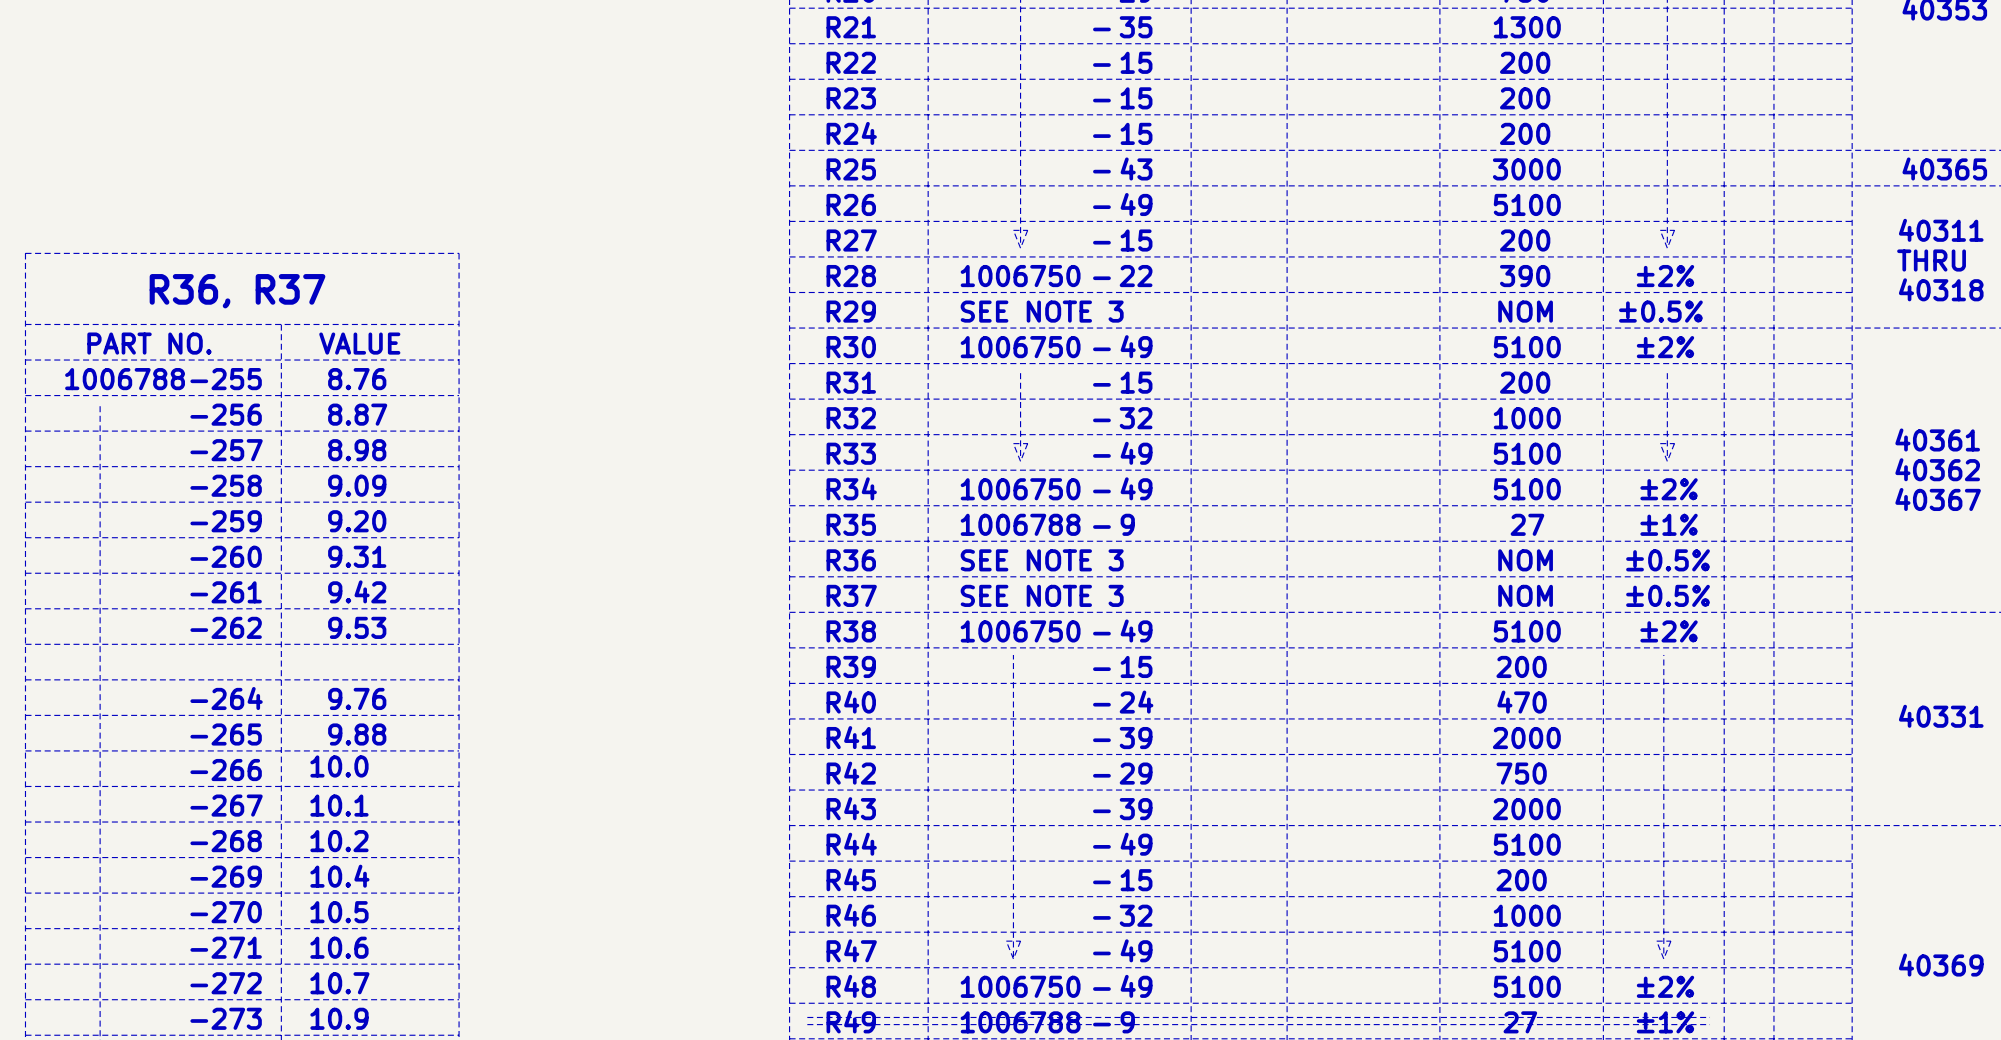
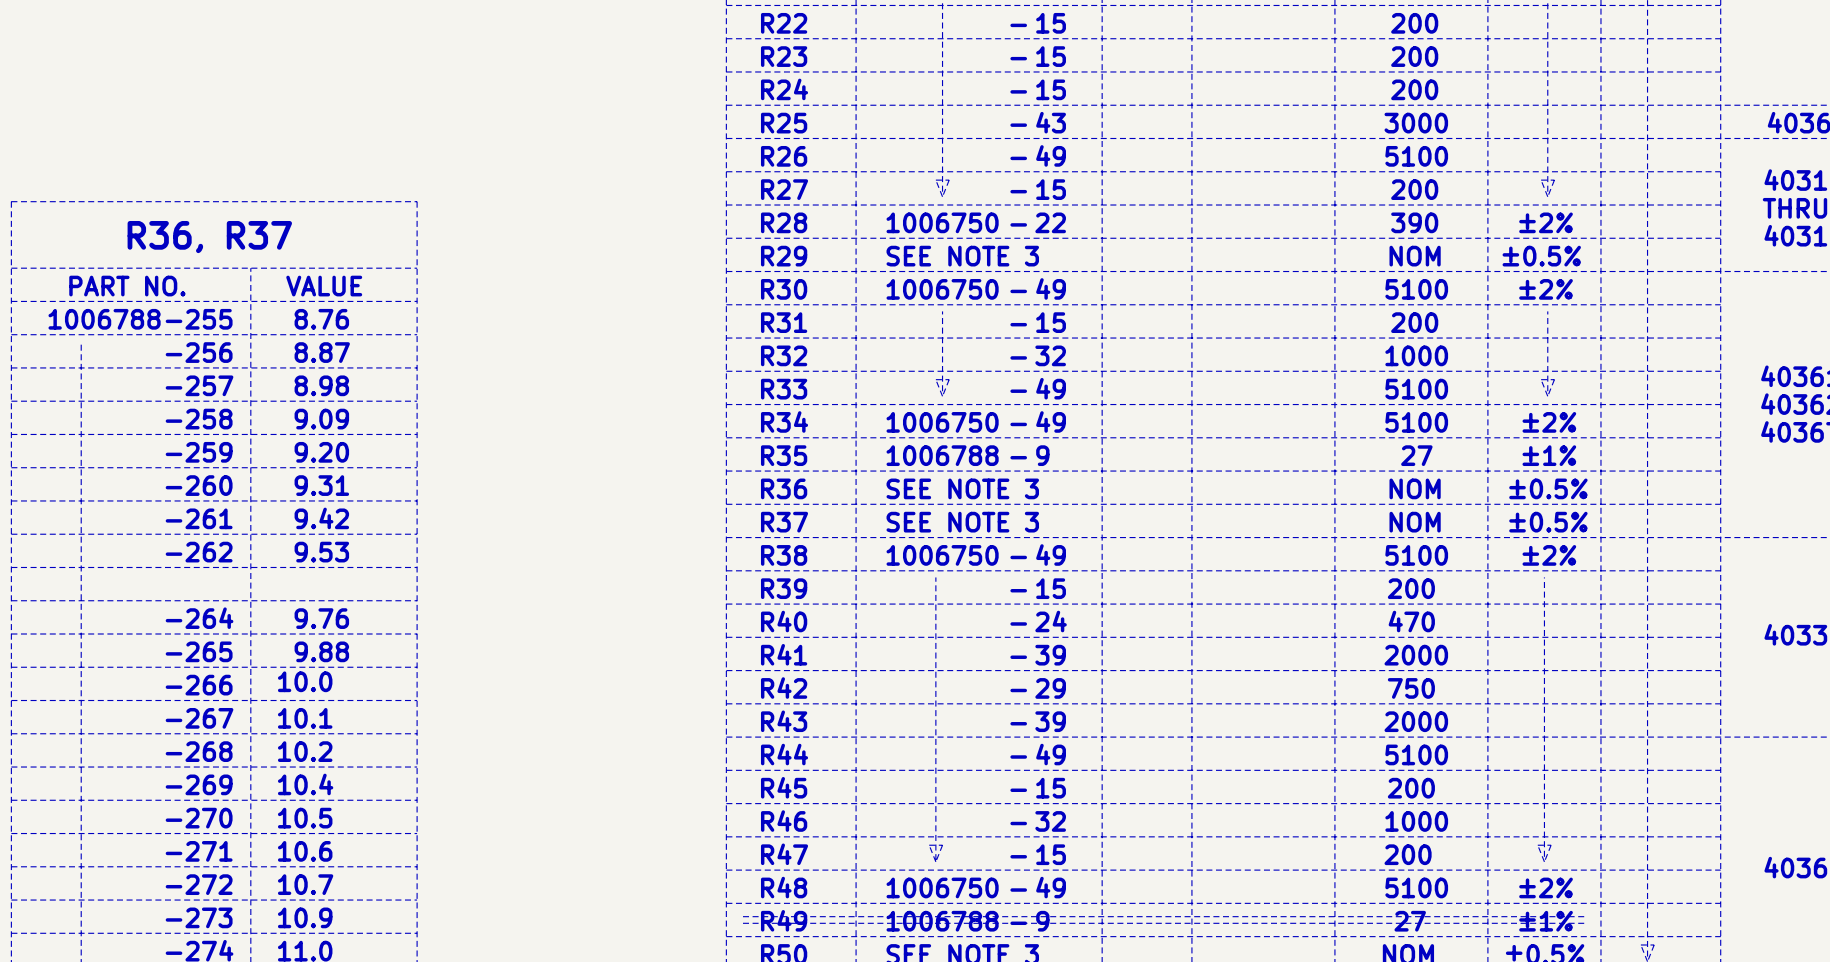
text: 49 (1136, 950) -> 15 (1051, 854)
text: 5100 (1527, 951) -> 200 (1408, 854)

